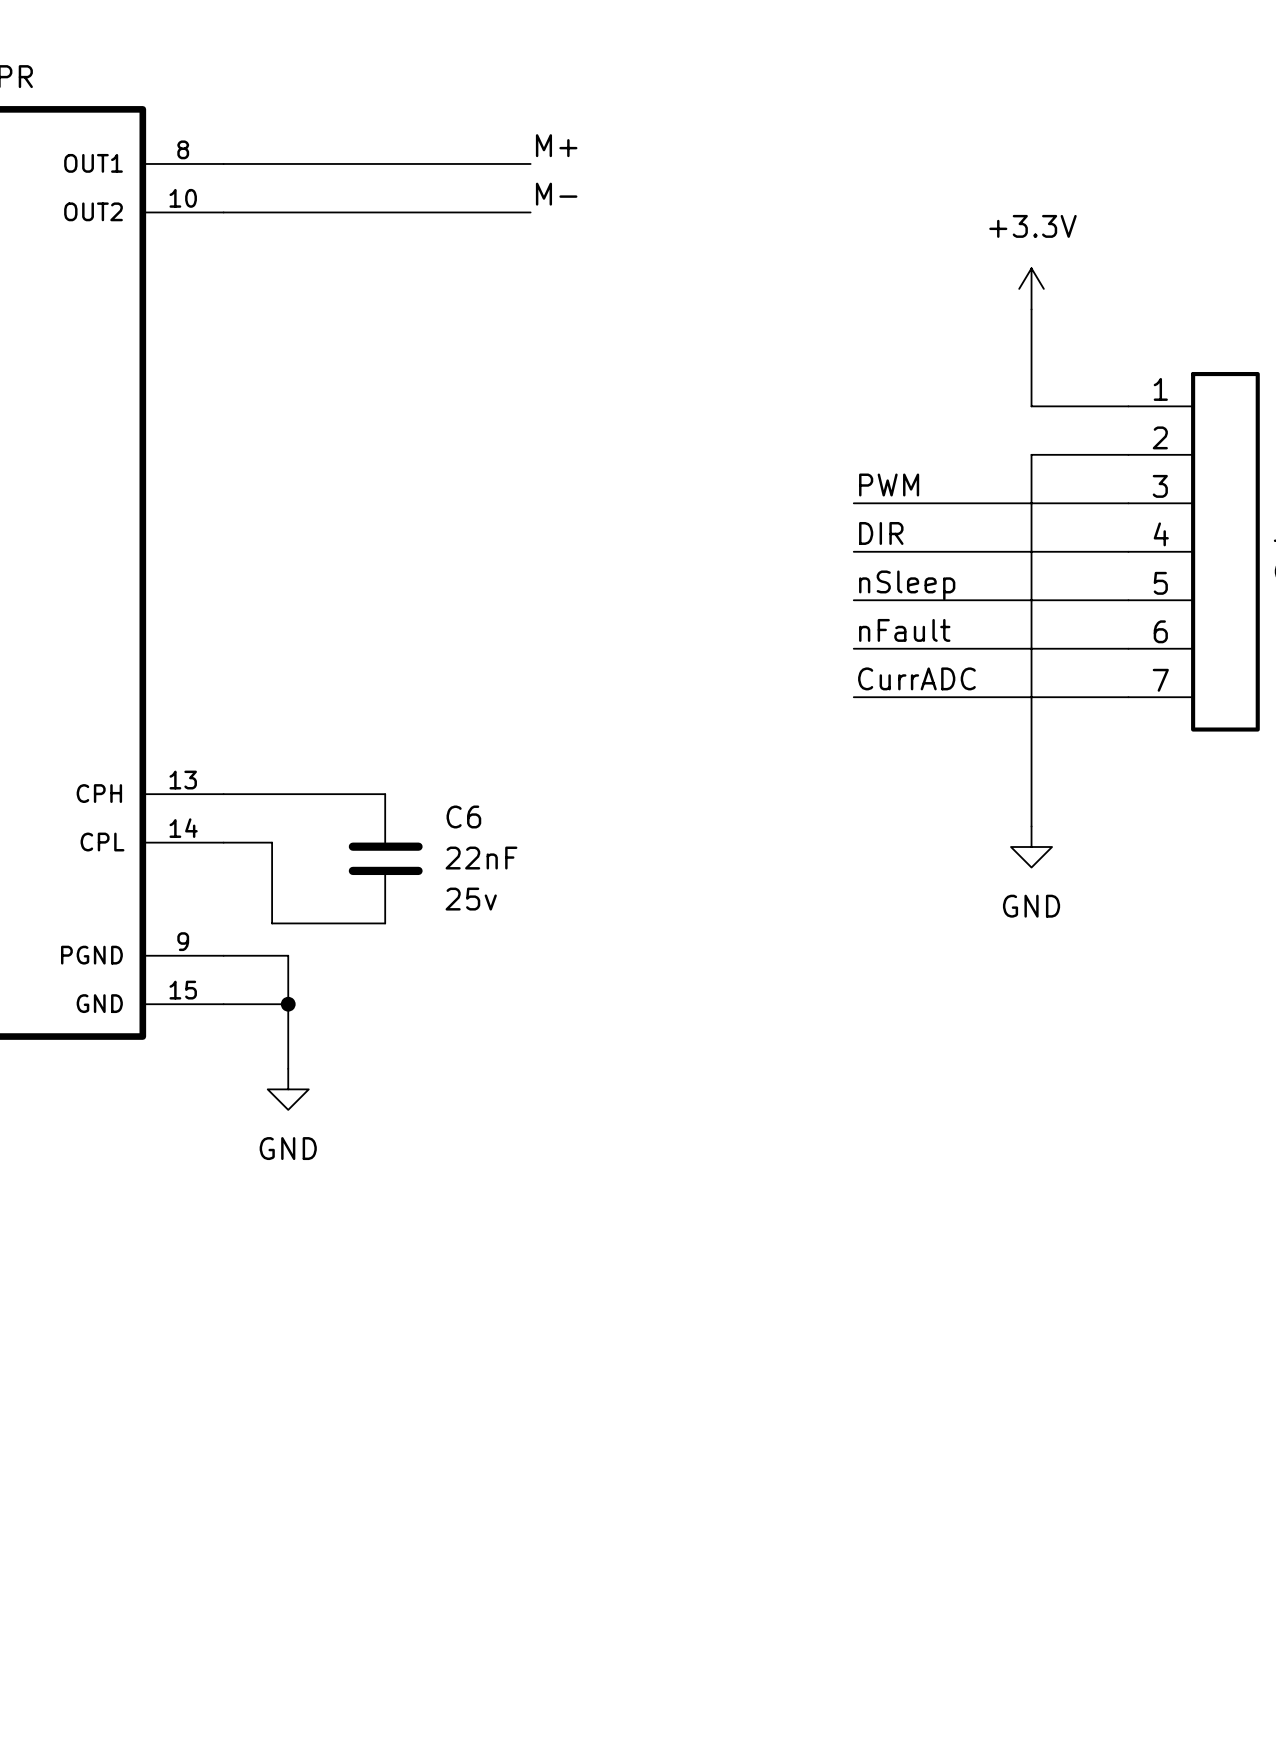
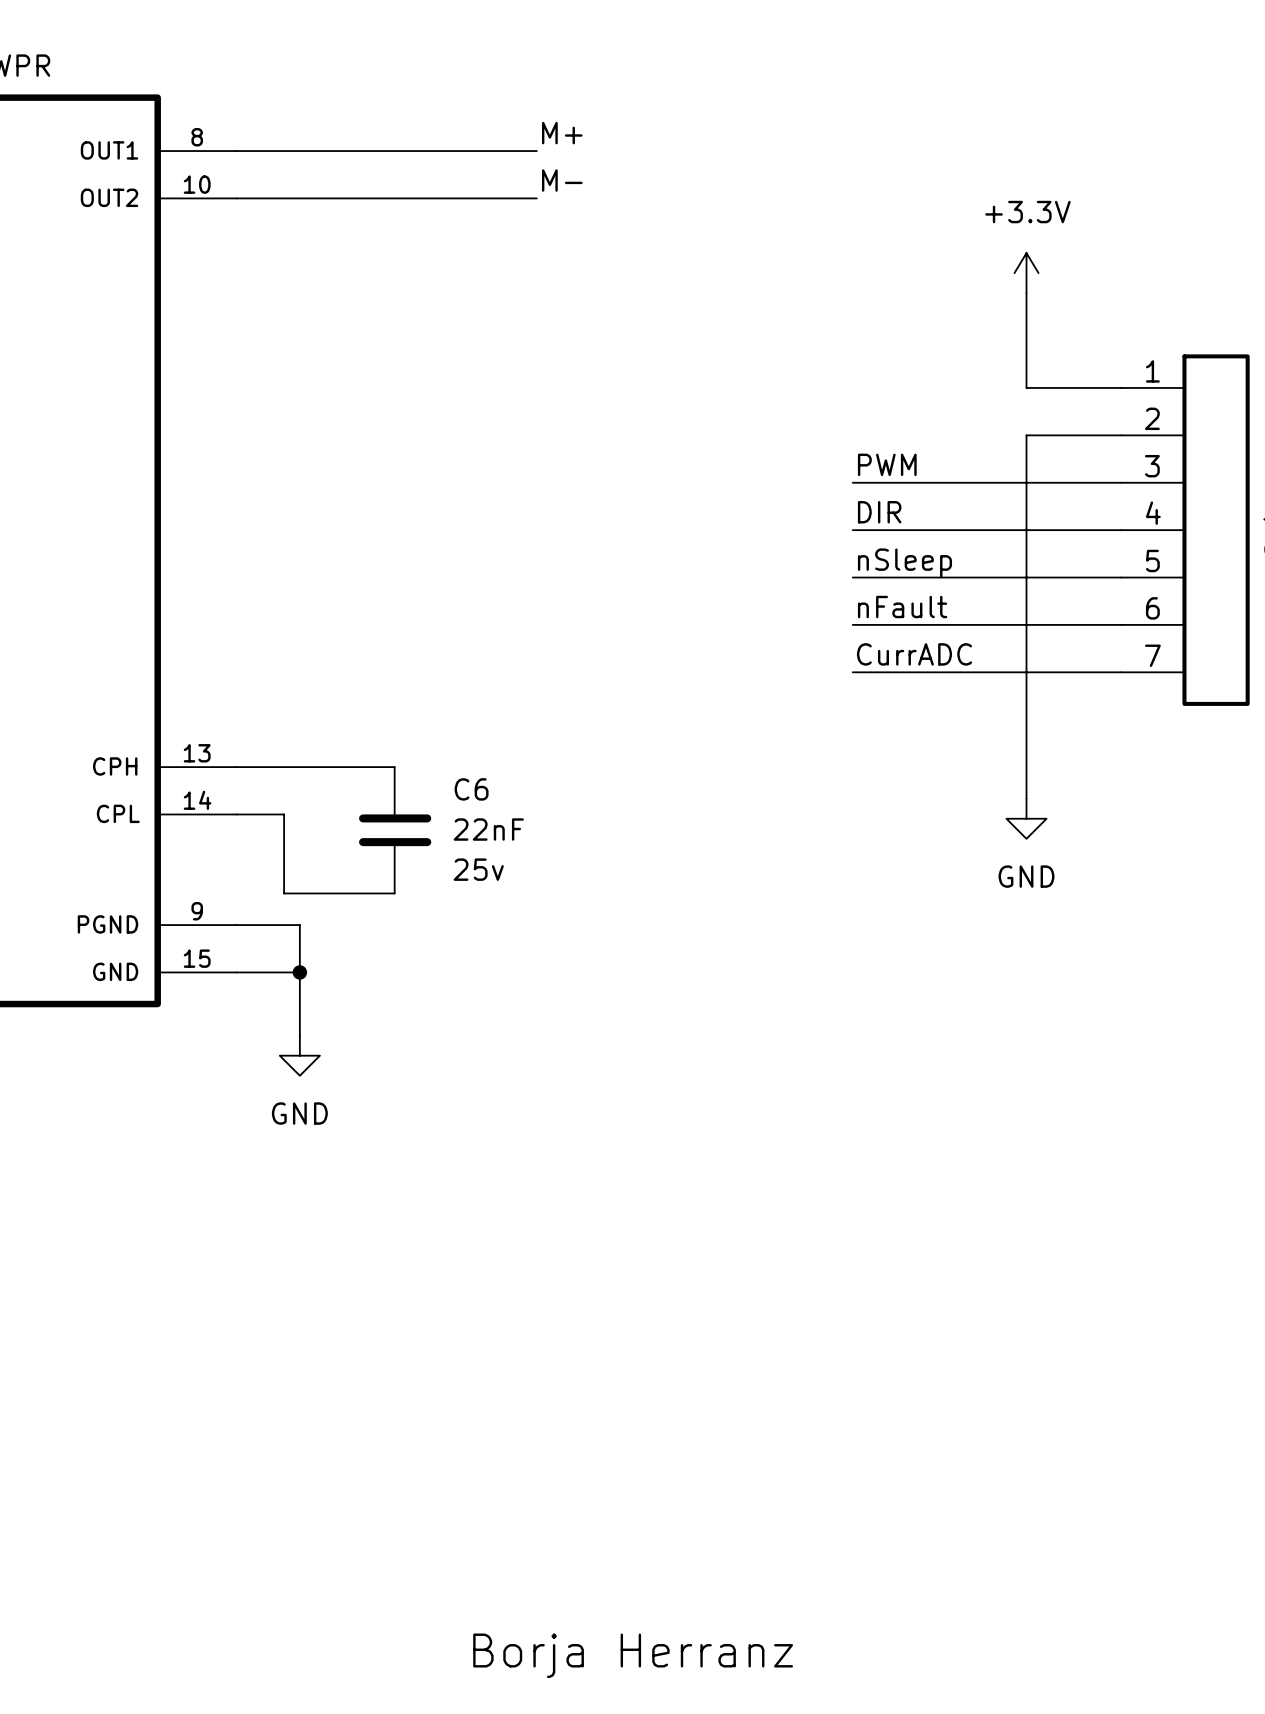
part: none -> (633, 1655)

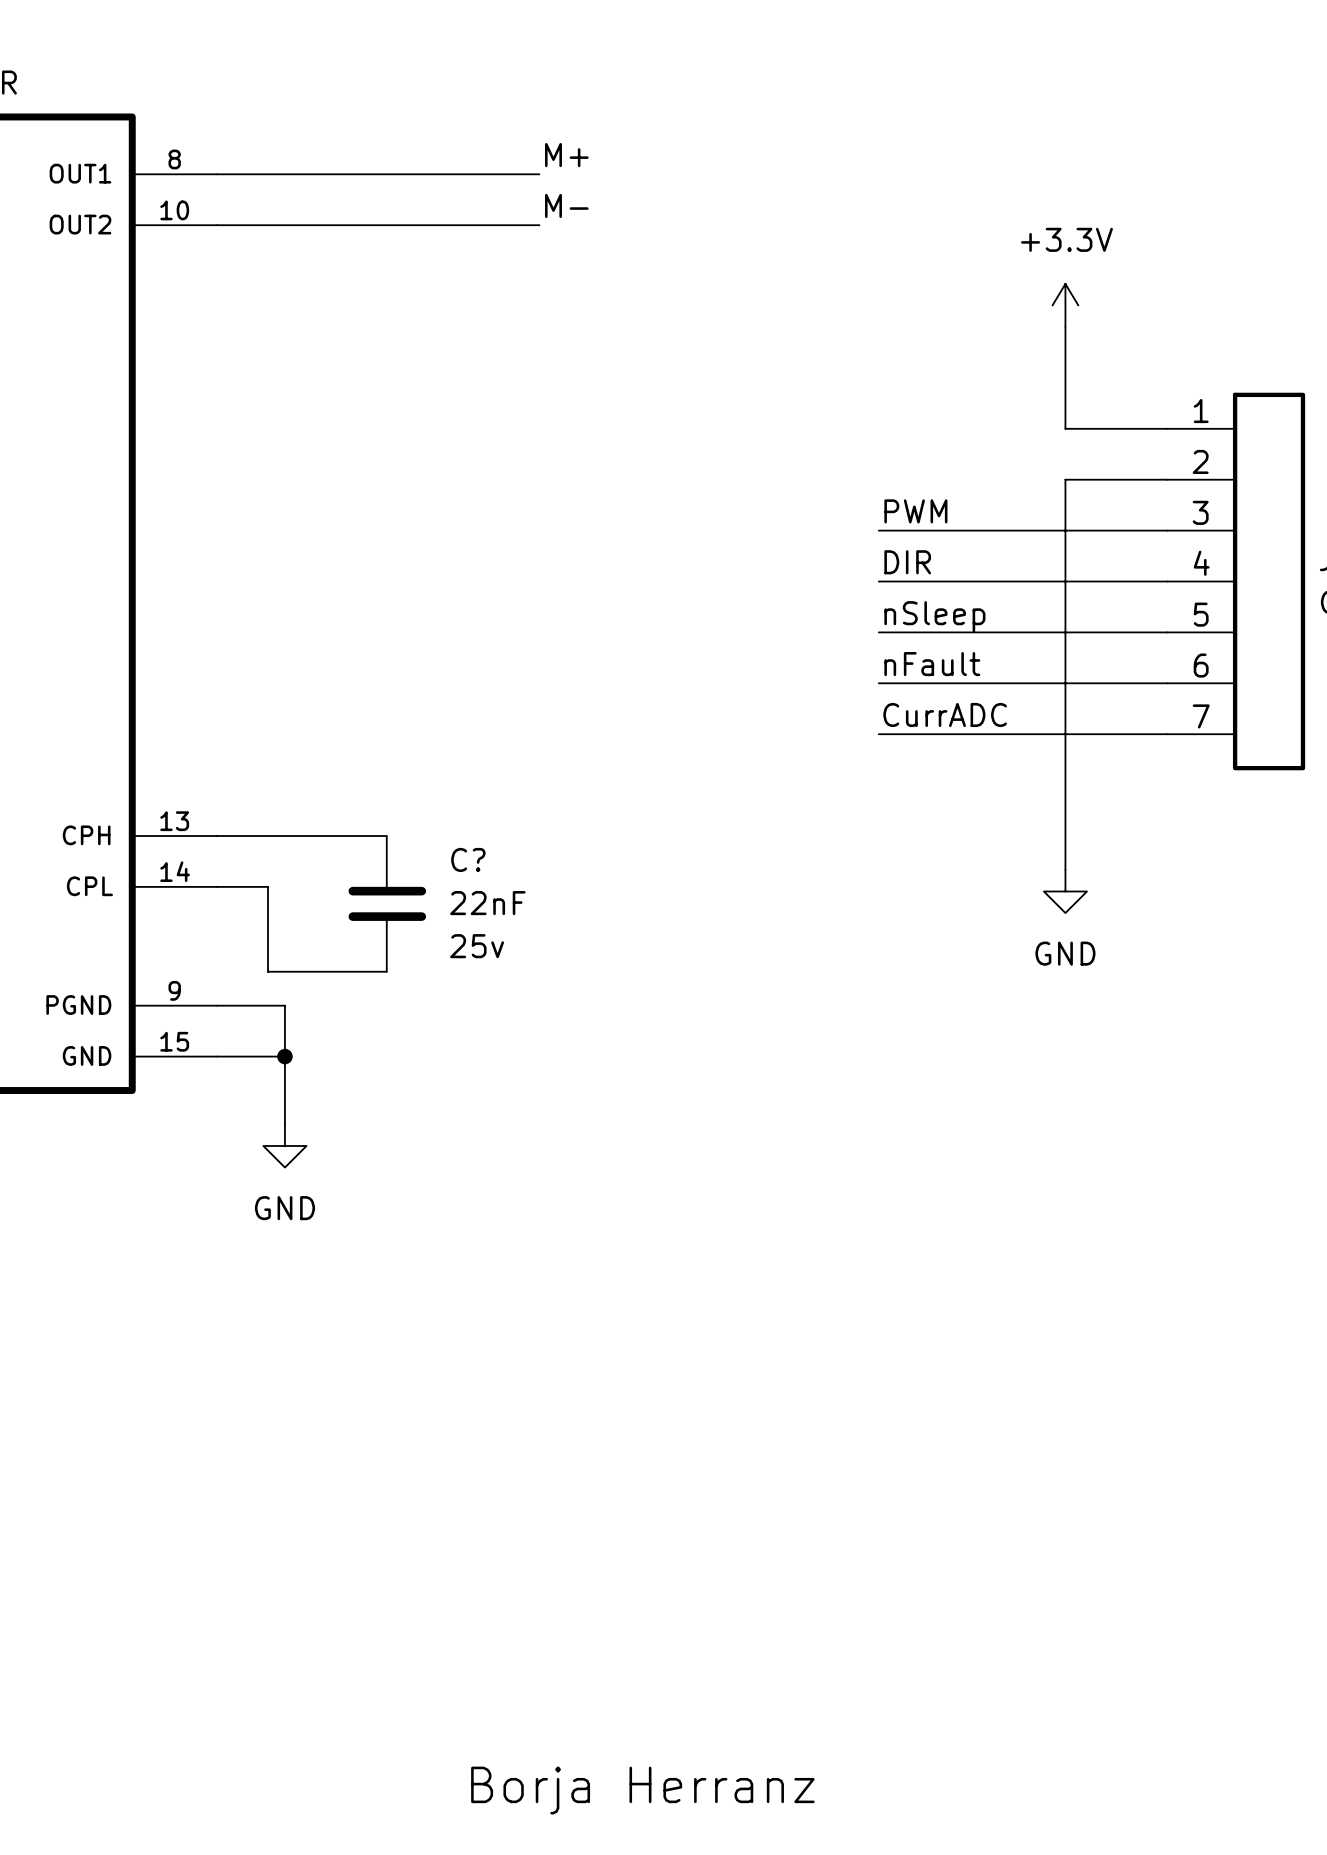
C6 name: C6 (471, 789) -> C? (468, 859)

